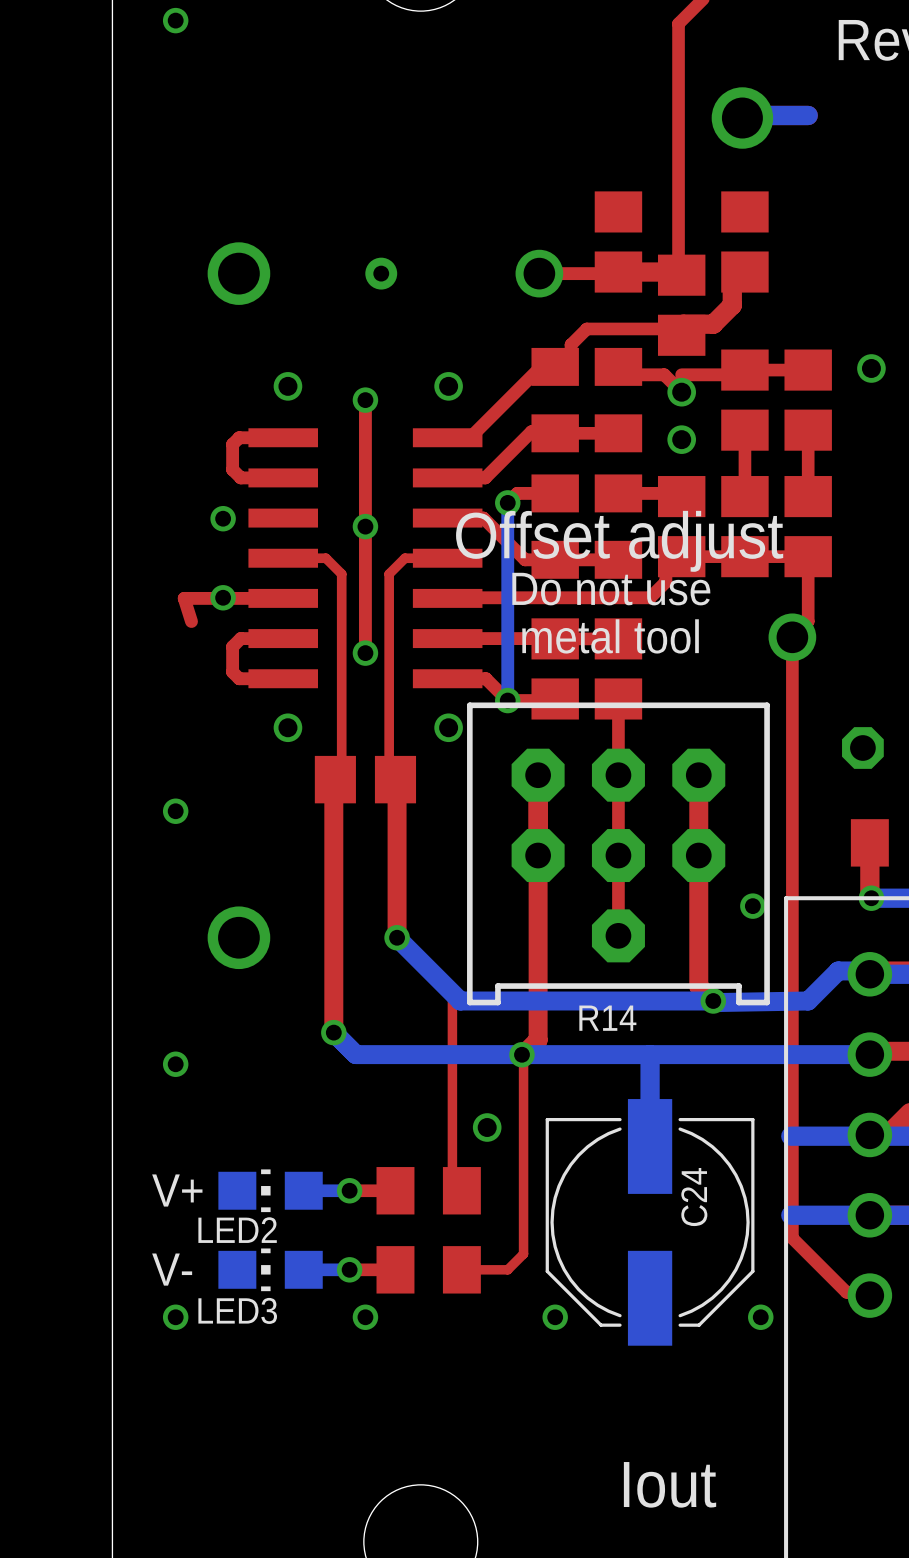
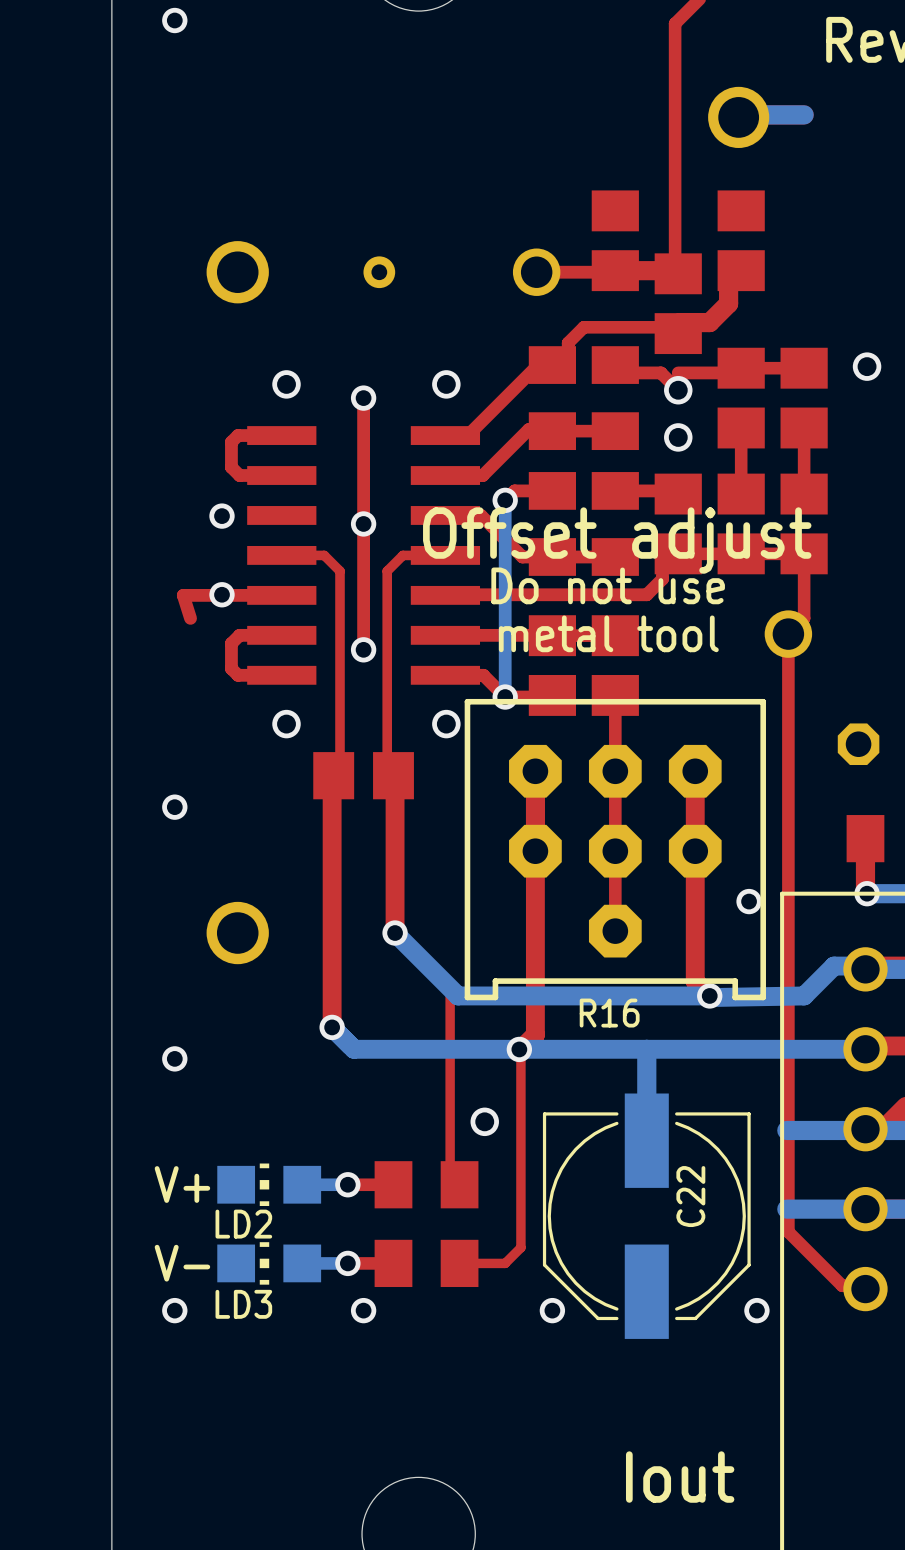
R14 name: R14 (607, 1018) -> R16 (609, 1013)
C24 name: C24 (694, 1197) -> C22 (690, 1196)
LED2 name: LED2 (237, 1230) -> LD2 (243, 1224)
LED3 name: LED3 (237, 1310) -> LD3 (243, 1304)

